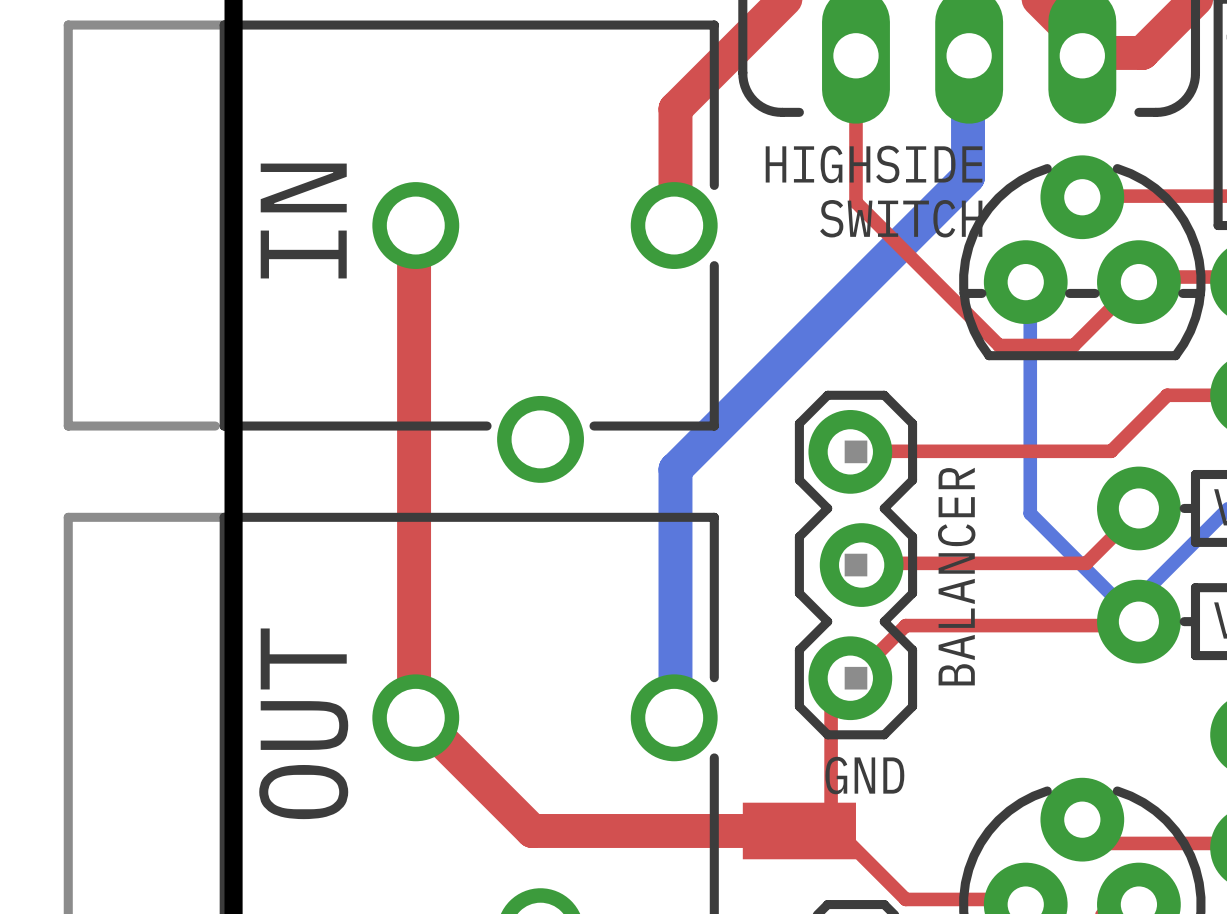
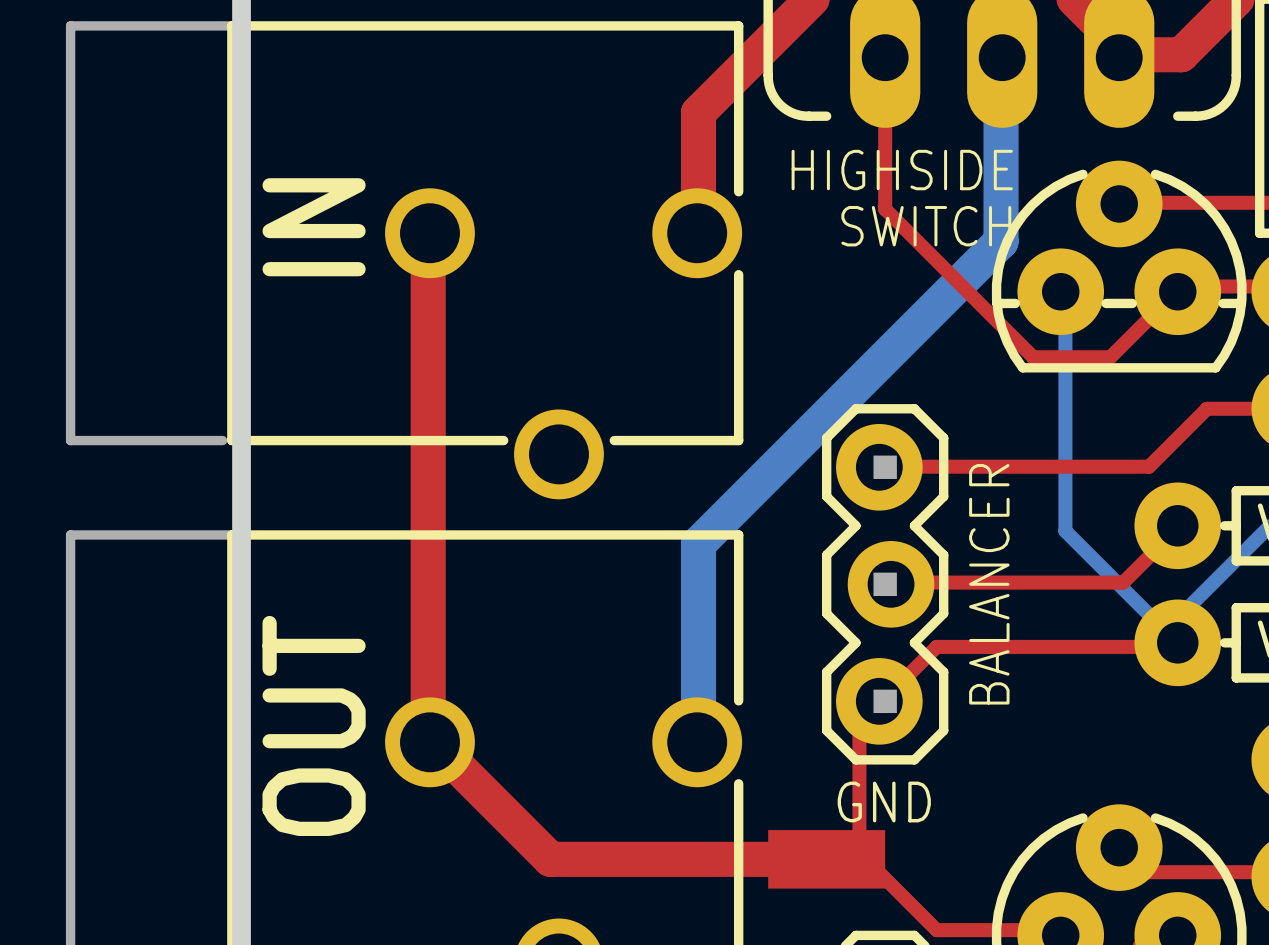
bottom track: (968, 176) (675, 469) (675, 526) -> (1001, 182) (1001, 241) (698, 543)

